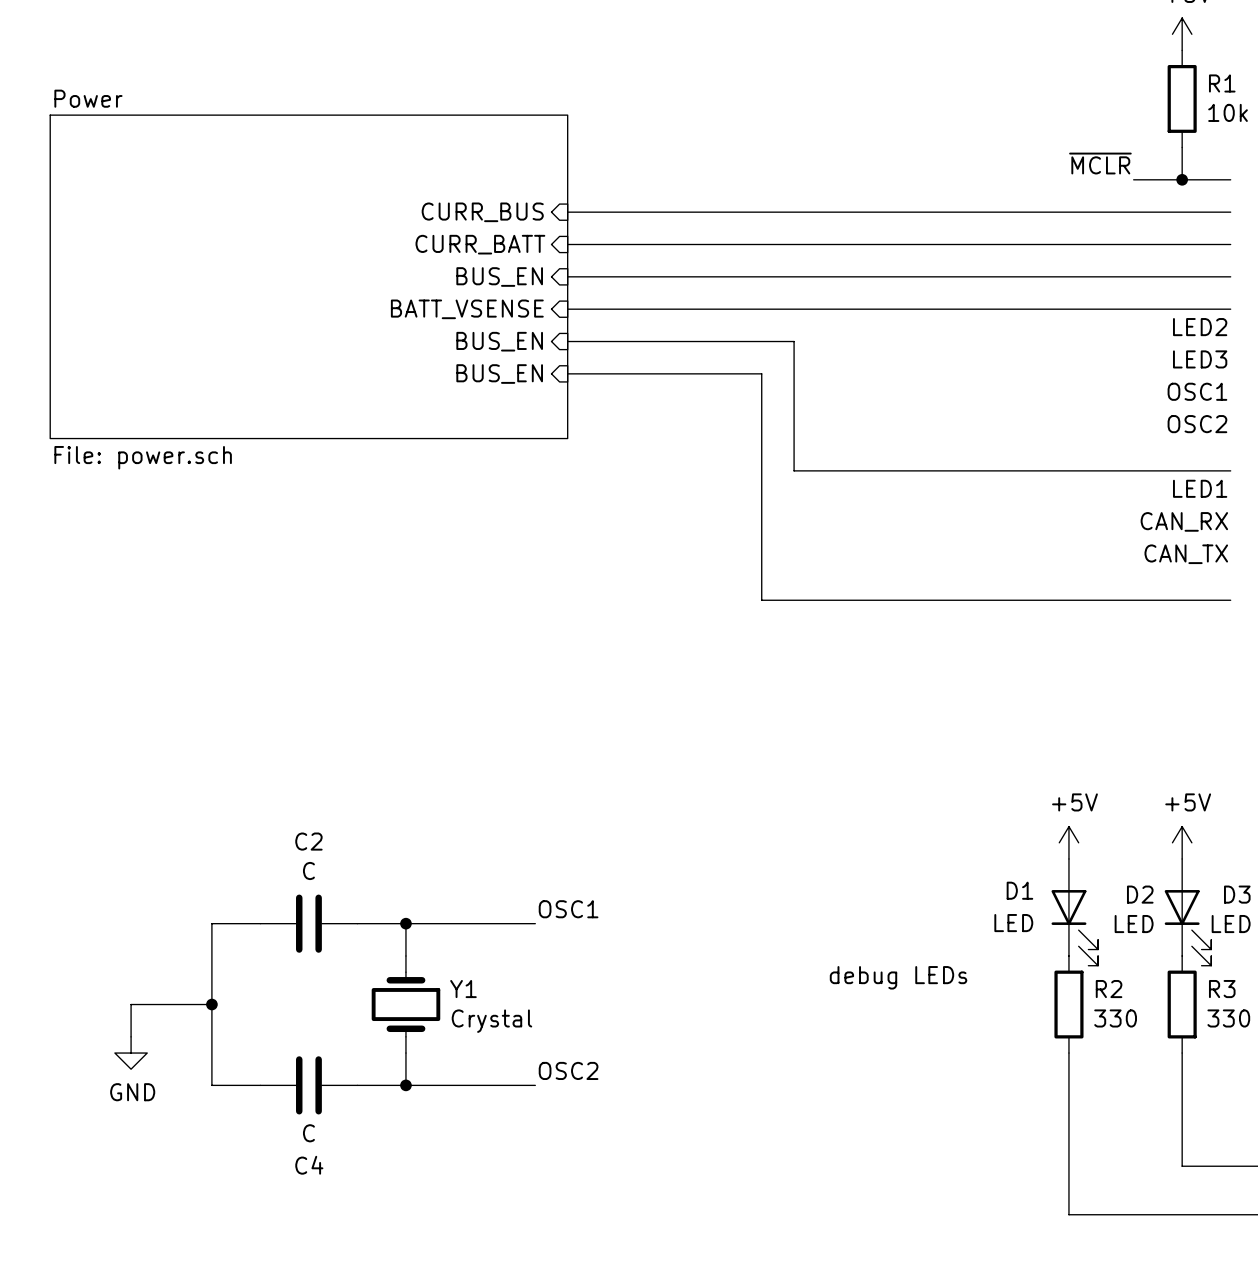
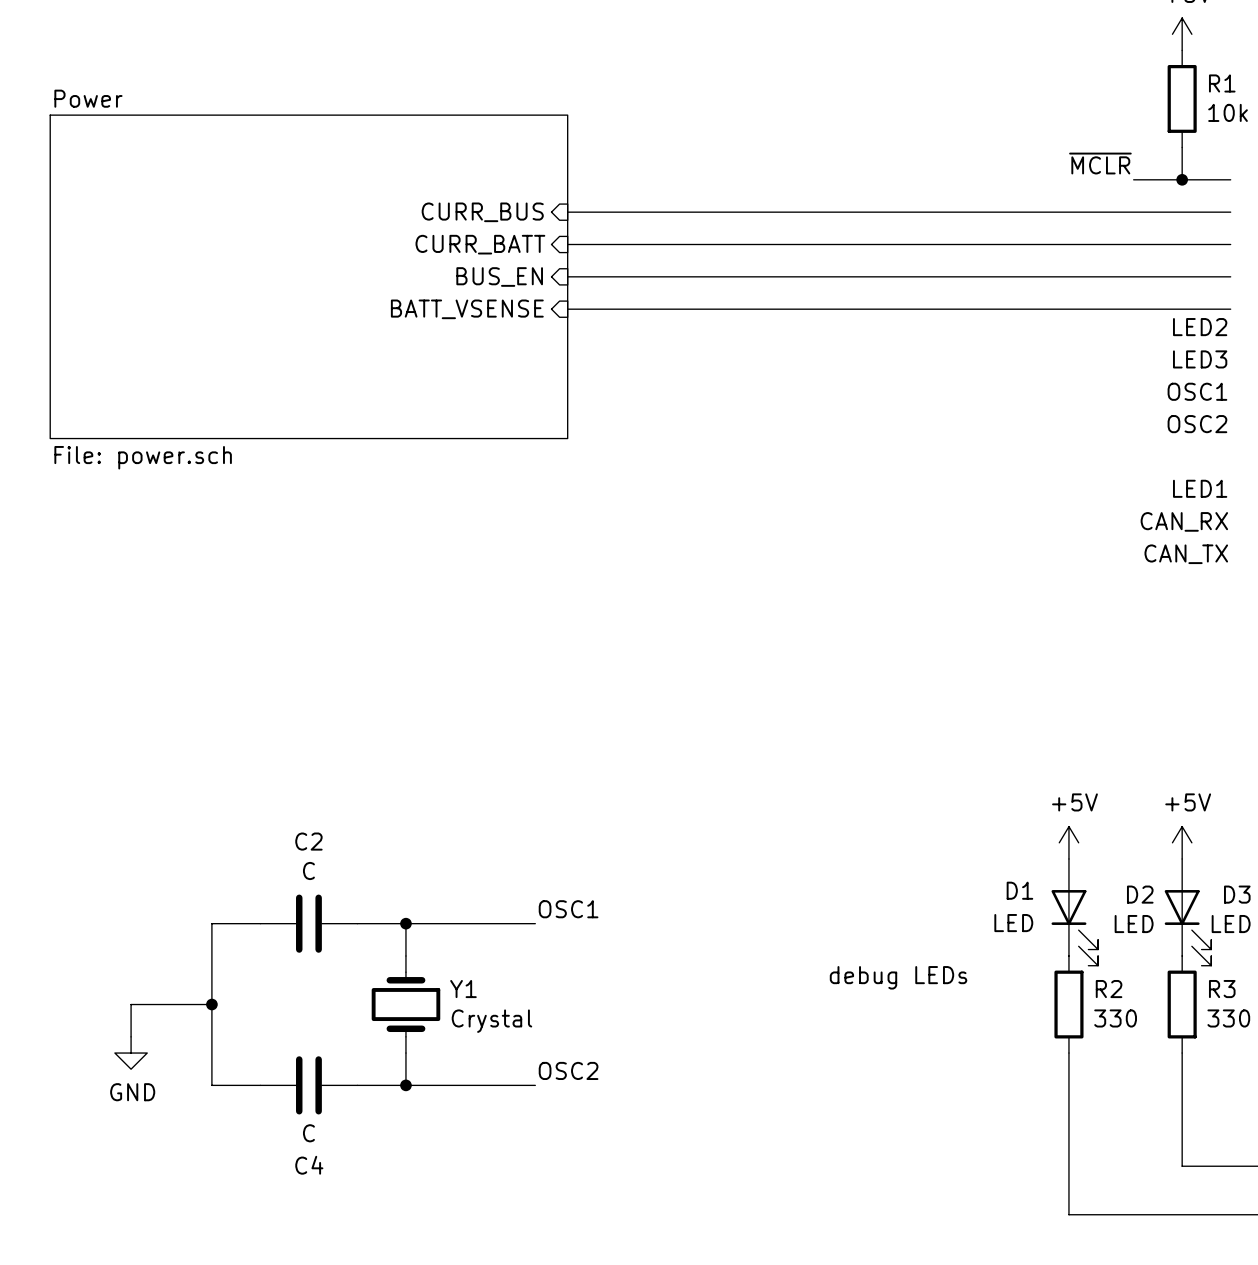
hierarchical label: BUS_EN (499, 341) -> none
wire: (567, 341) (794, 341) (794, 470) (1230, 470) -> none
wire: (567, 373) (761, 373) (761, 600) (1230, 600) -> none
hierarchical label: BUS_EN (499, 374) -> none

